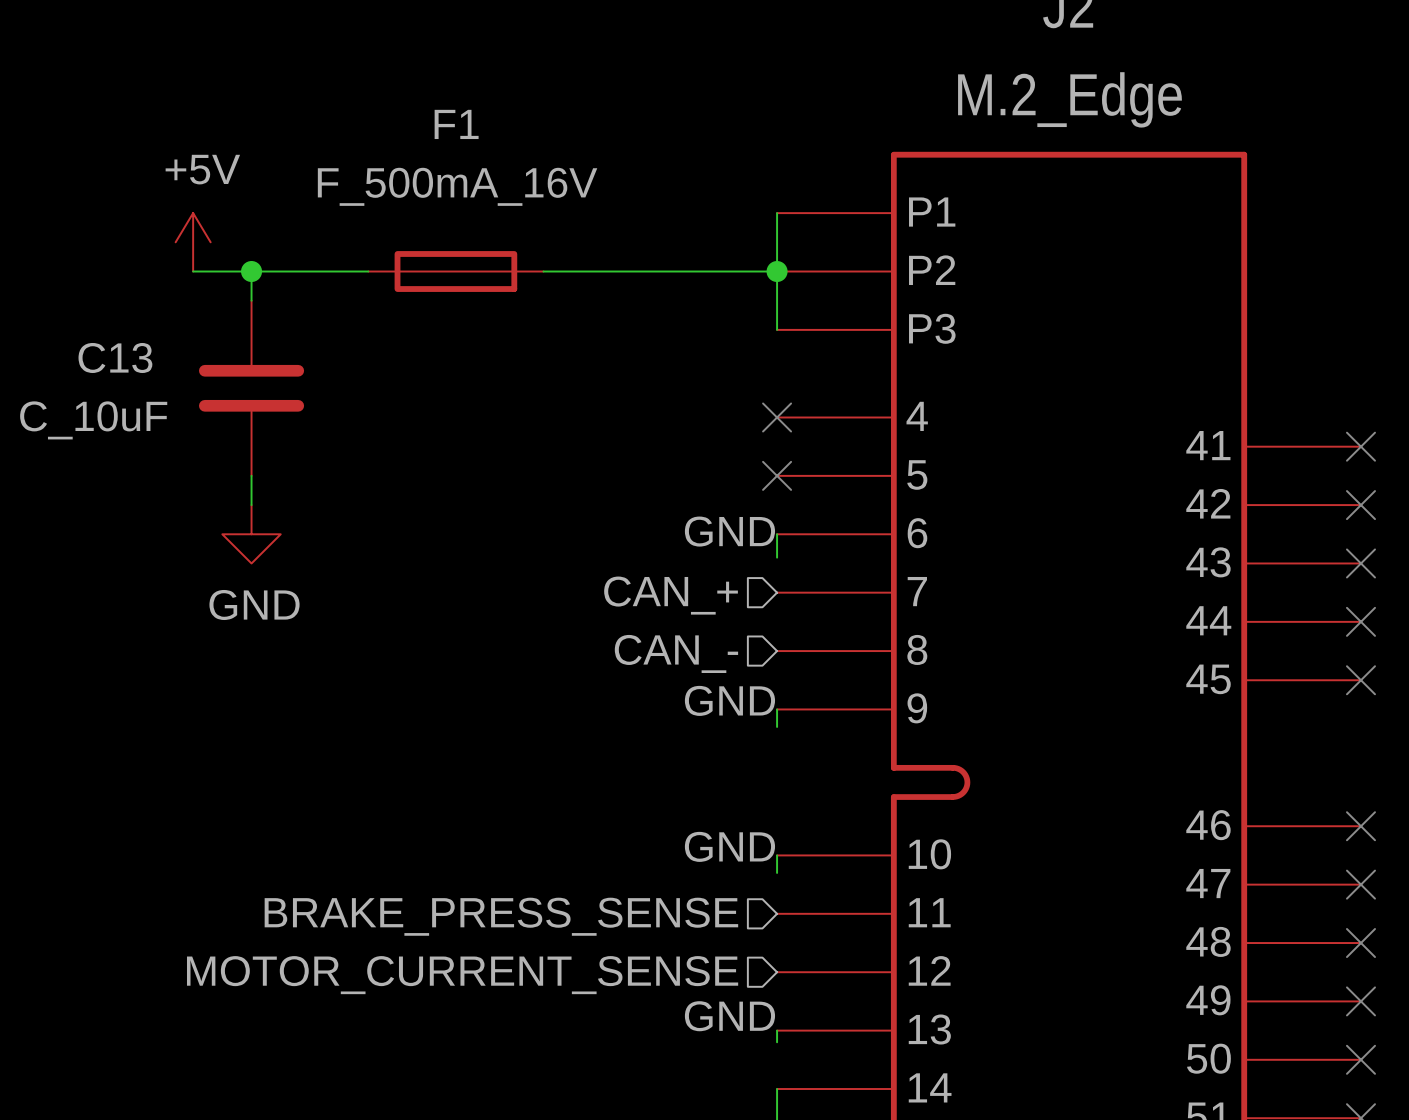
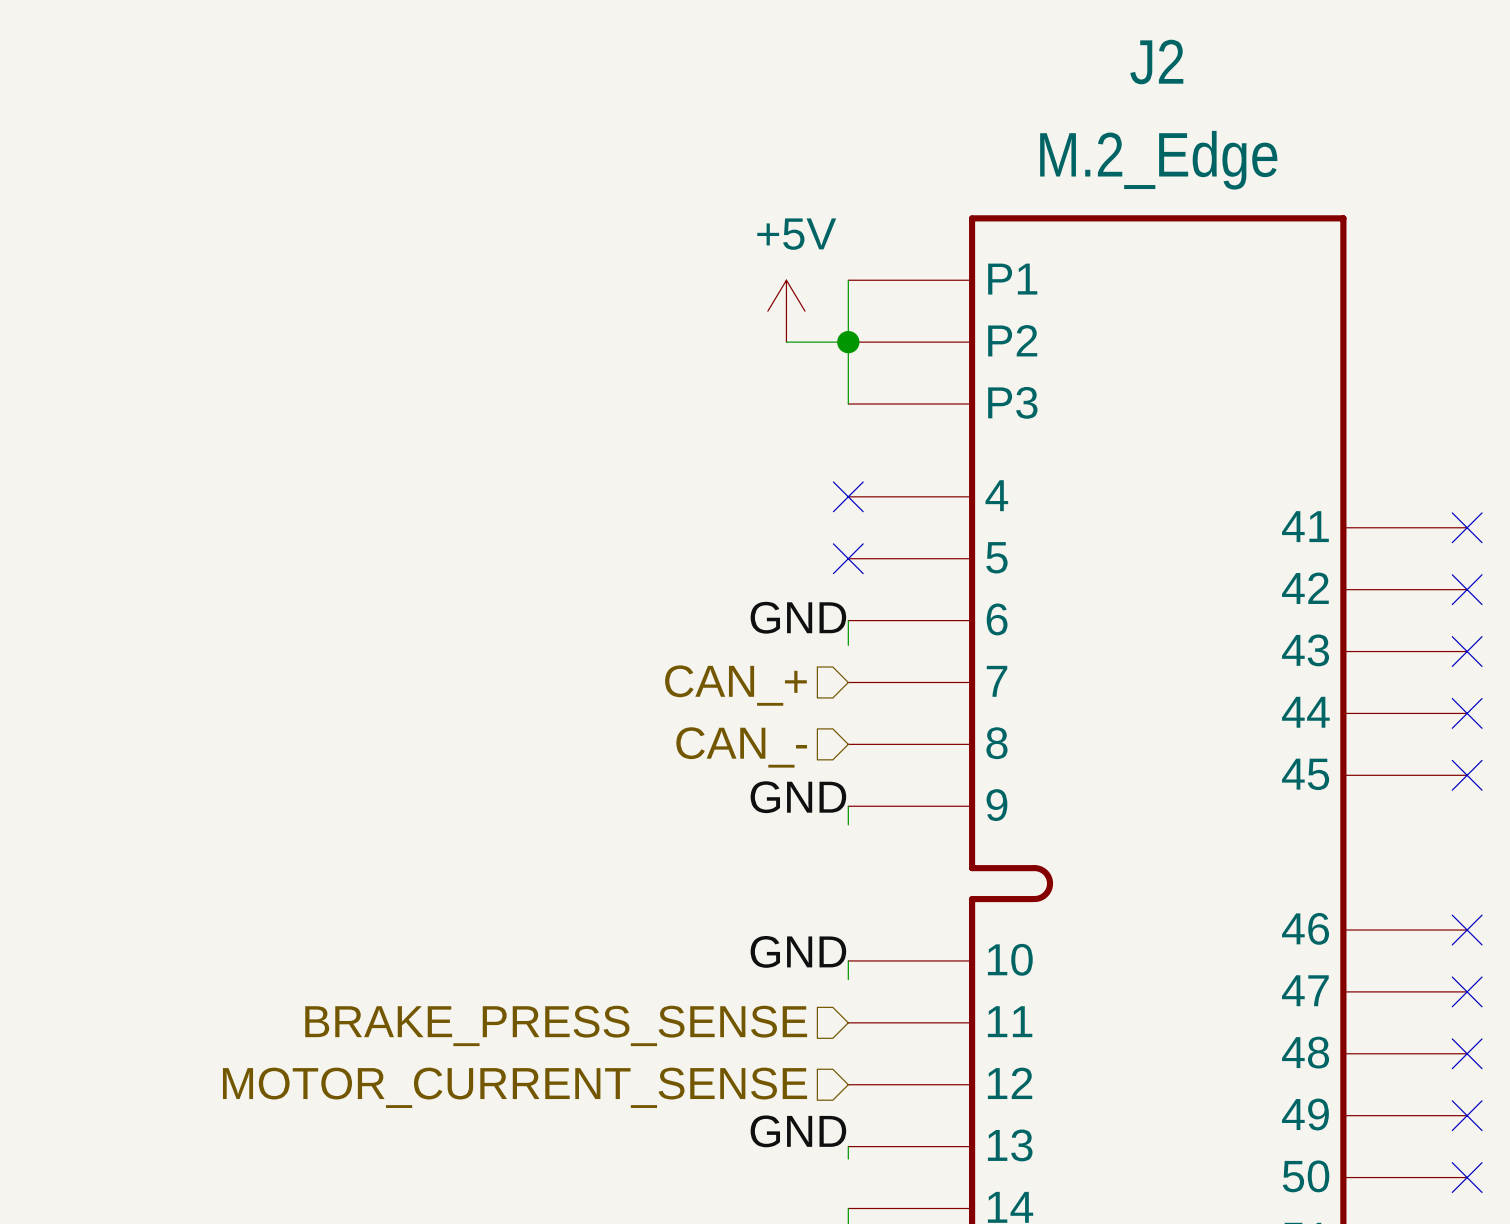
power symbol position: +5V (193, 242) -> +5V (786, 311)
wire: (193, 271) (368, 271) -> none
wire: (251, 271) (251, 300) -> none
junction: (251, 271) -> none
F1: F_500mA_16V (455, 271) -> none
wire: (543, 271) (718, 271) -> none
C13: C_10uF (251, 388) -> none
wire: (251, 475) (251, 505) -> none
power symbol: GND (251, 534) -> none

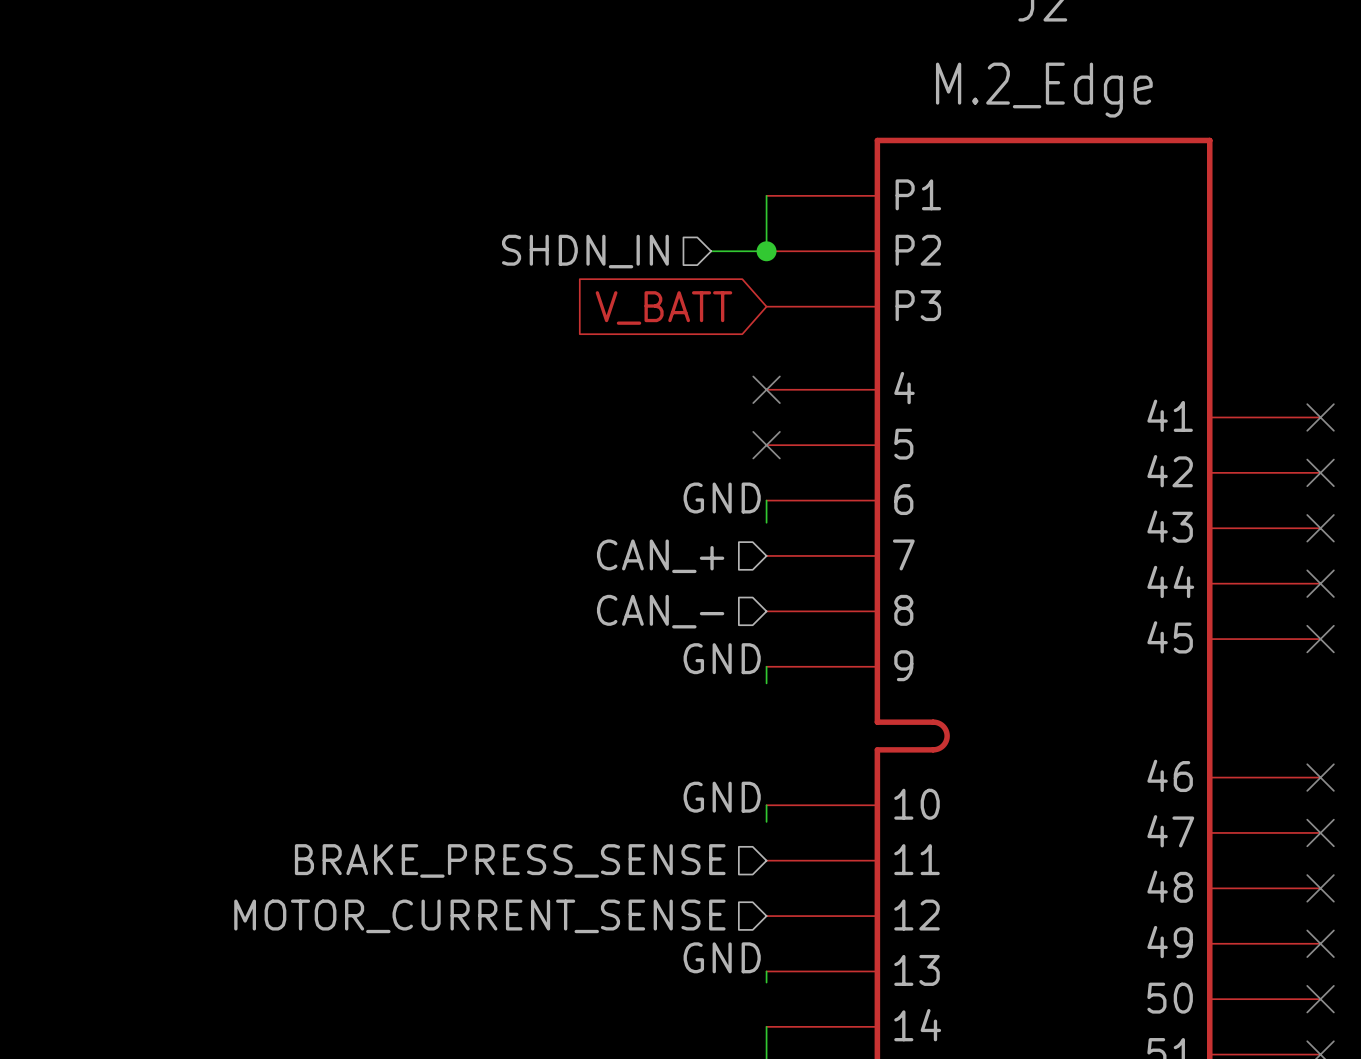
power symbol: +5V (786, 311) -> none
wire: (848, 342) (848, 404) -> none
hierarchical label: none -> SHDN_IN (585, 251)
global label: none -> V_BATT (663, 307)

